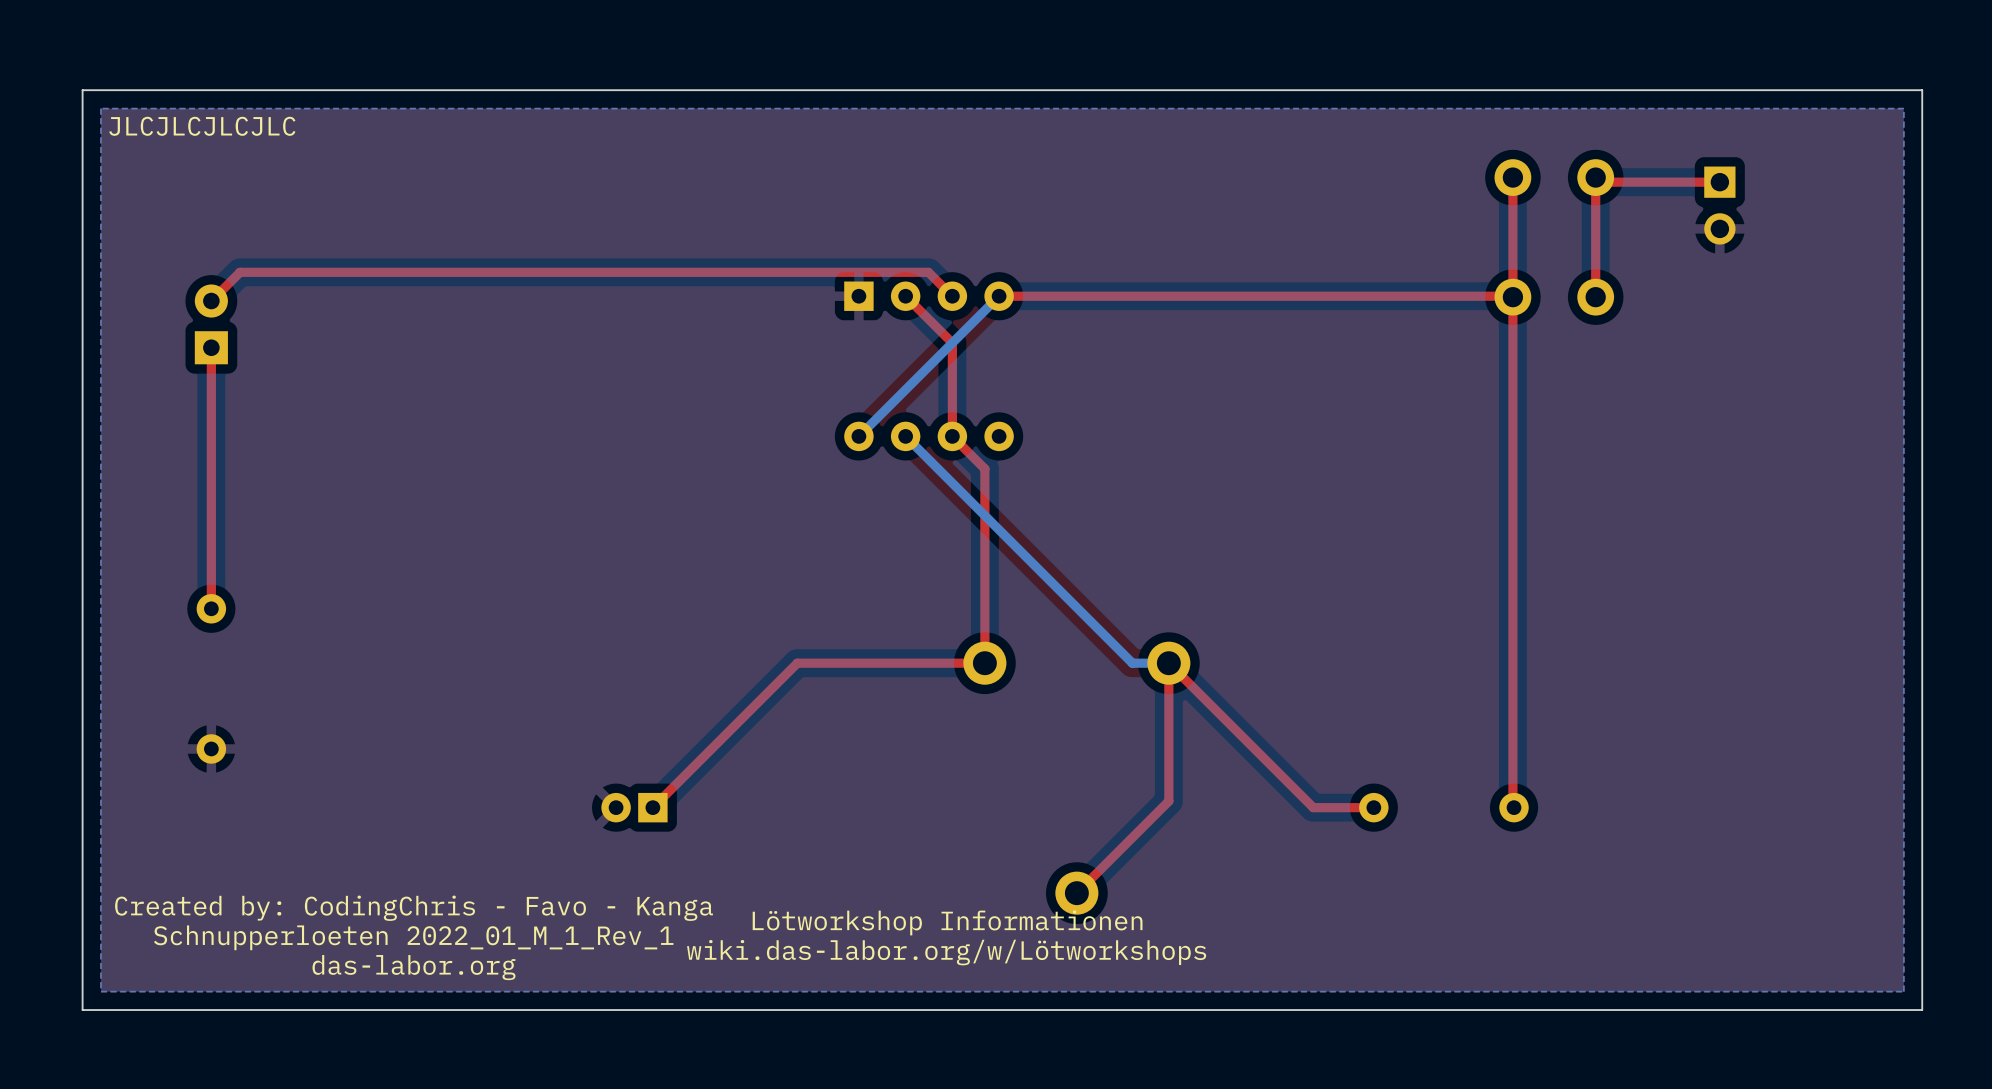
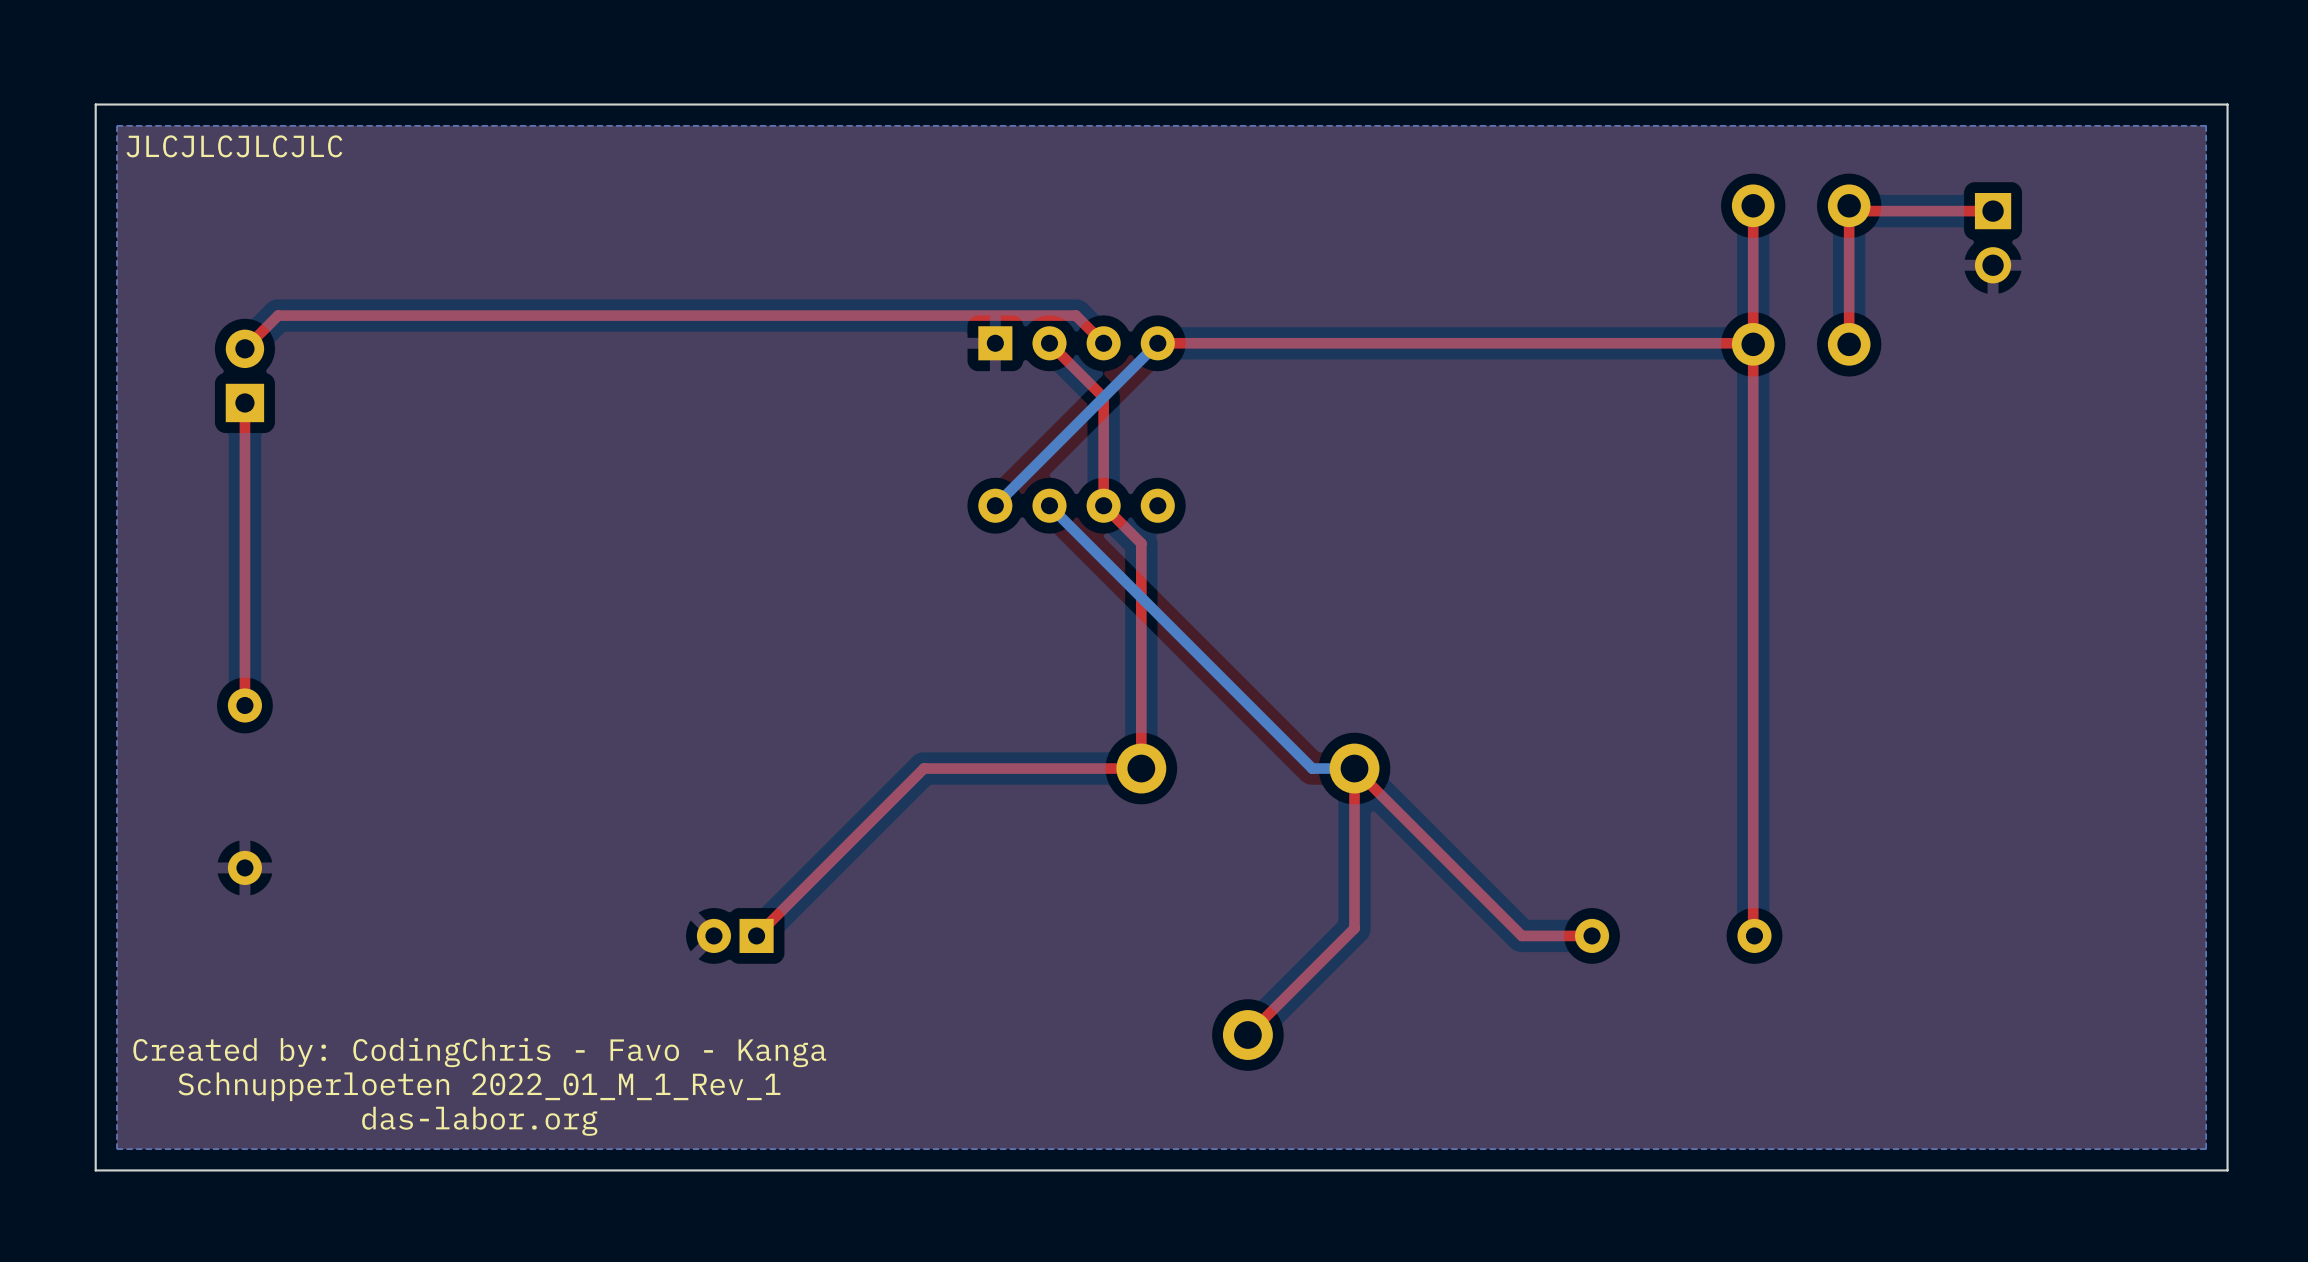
text: Lötworkshop Informationen (947, 922) -> none
text: wiki.das-labor.org/w/Lötworkshops (946, 952) -> none

